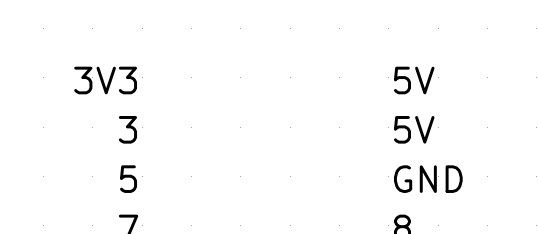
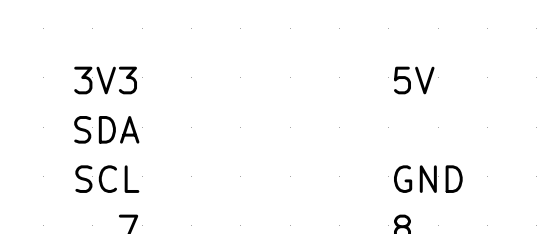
label: 3 (127, 129) -> SDA (106, 129)
label: 5V (414, 129) -> none
label: 5 (128, 179) -> SCL (107, 179)

